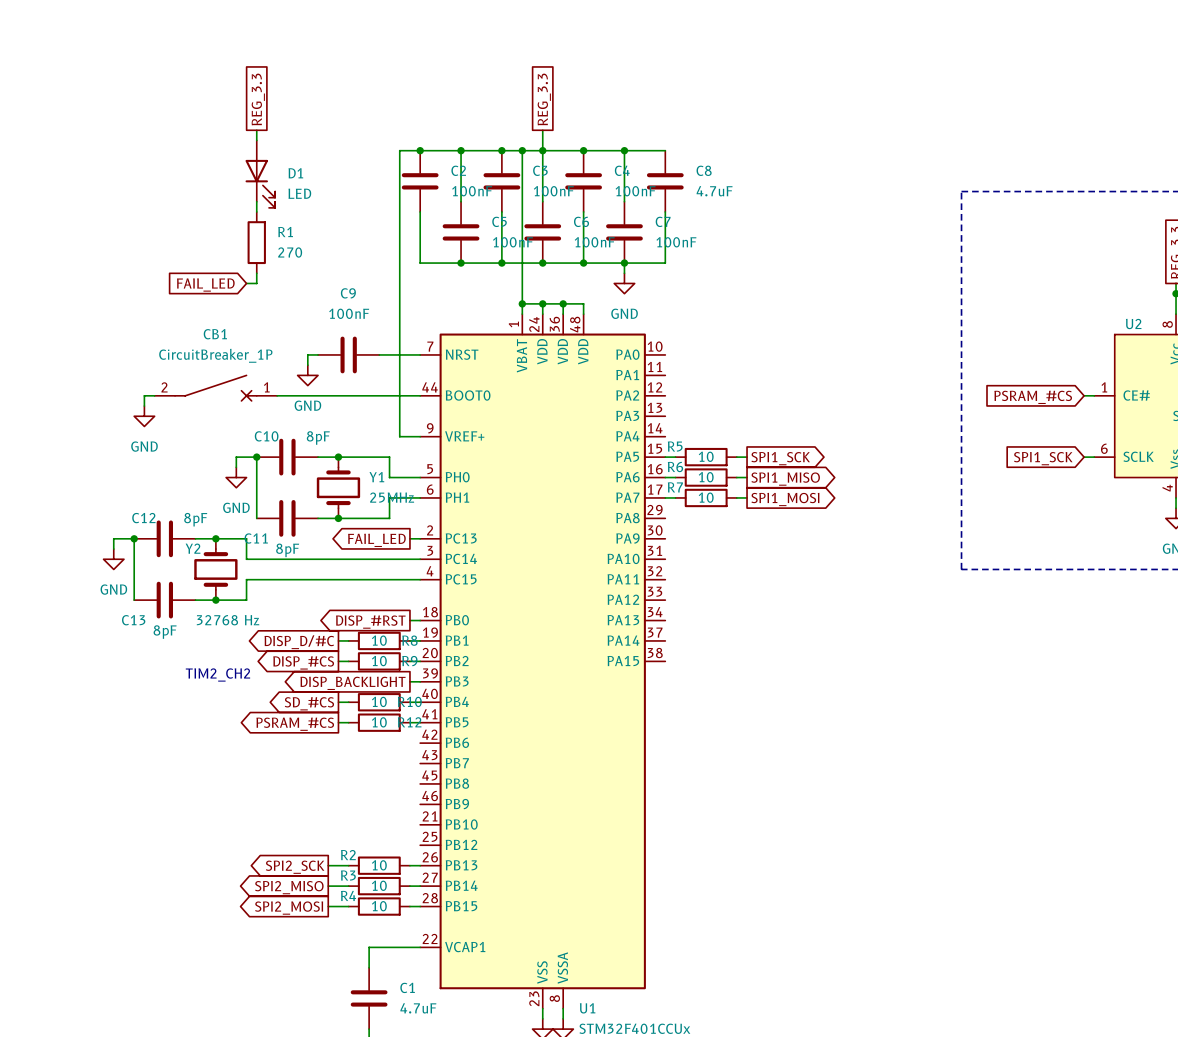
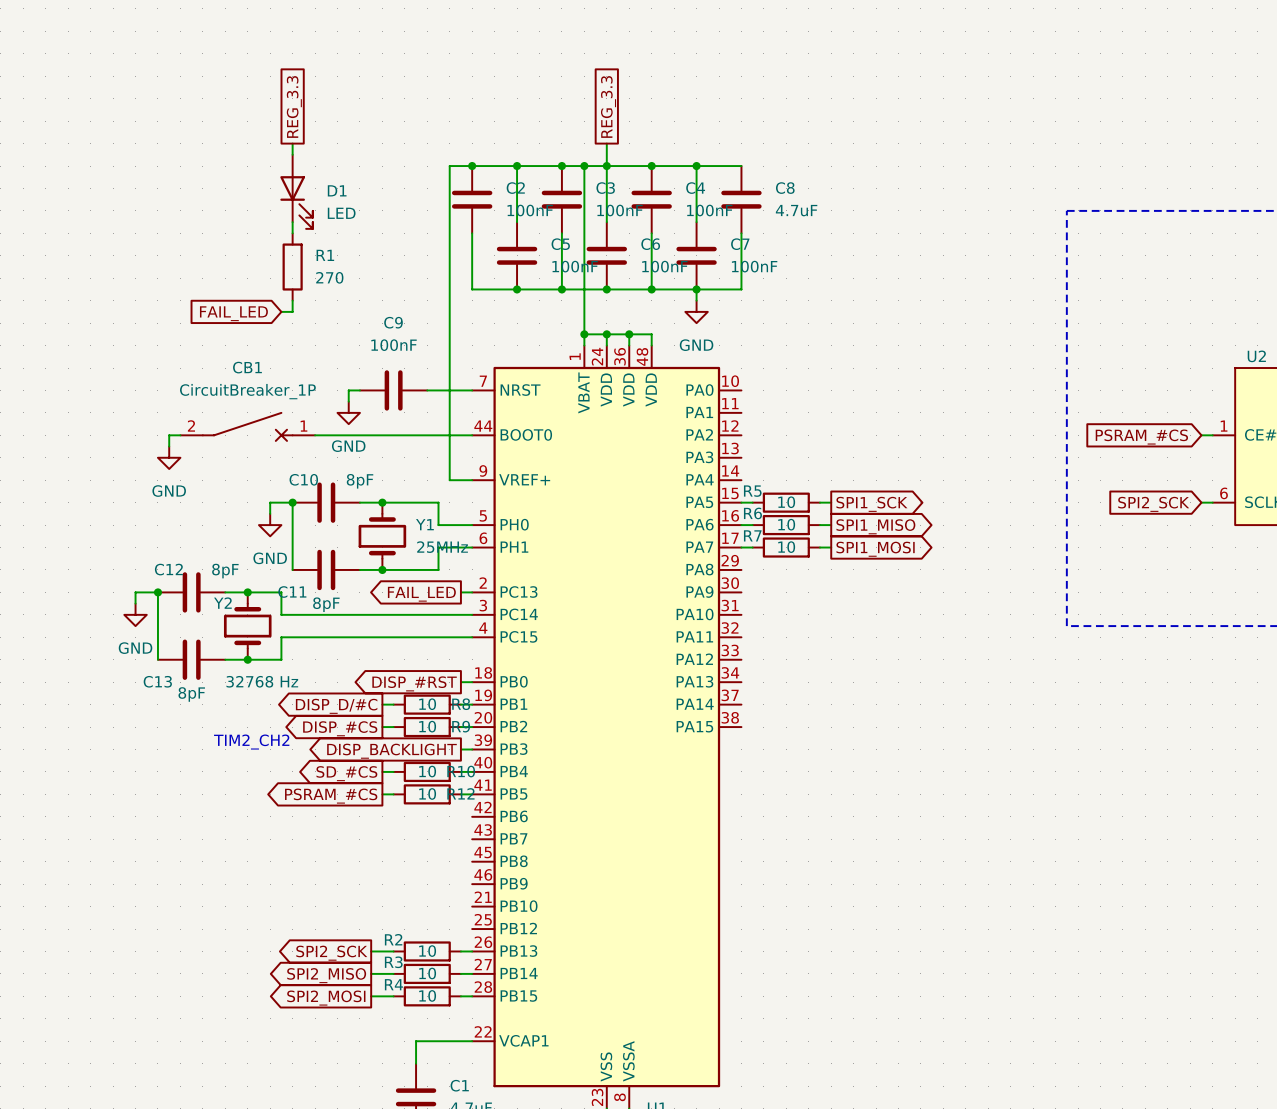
global label: SPI1_SCK (1043, 458) -> SPI2_SCK (1153, 504)

